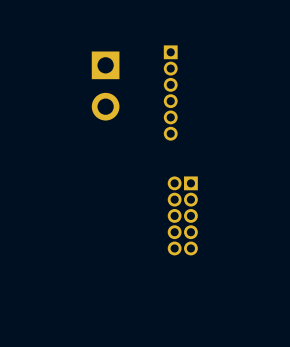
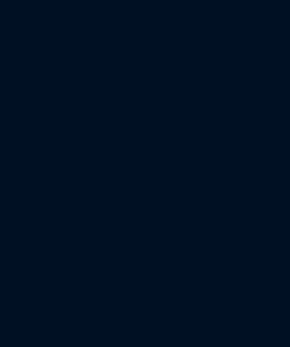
part: (105, 86) -> none
part: (170, 93) -> none
part: (182, 215) -> none

